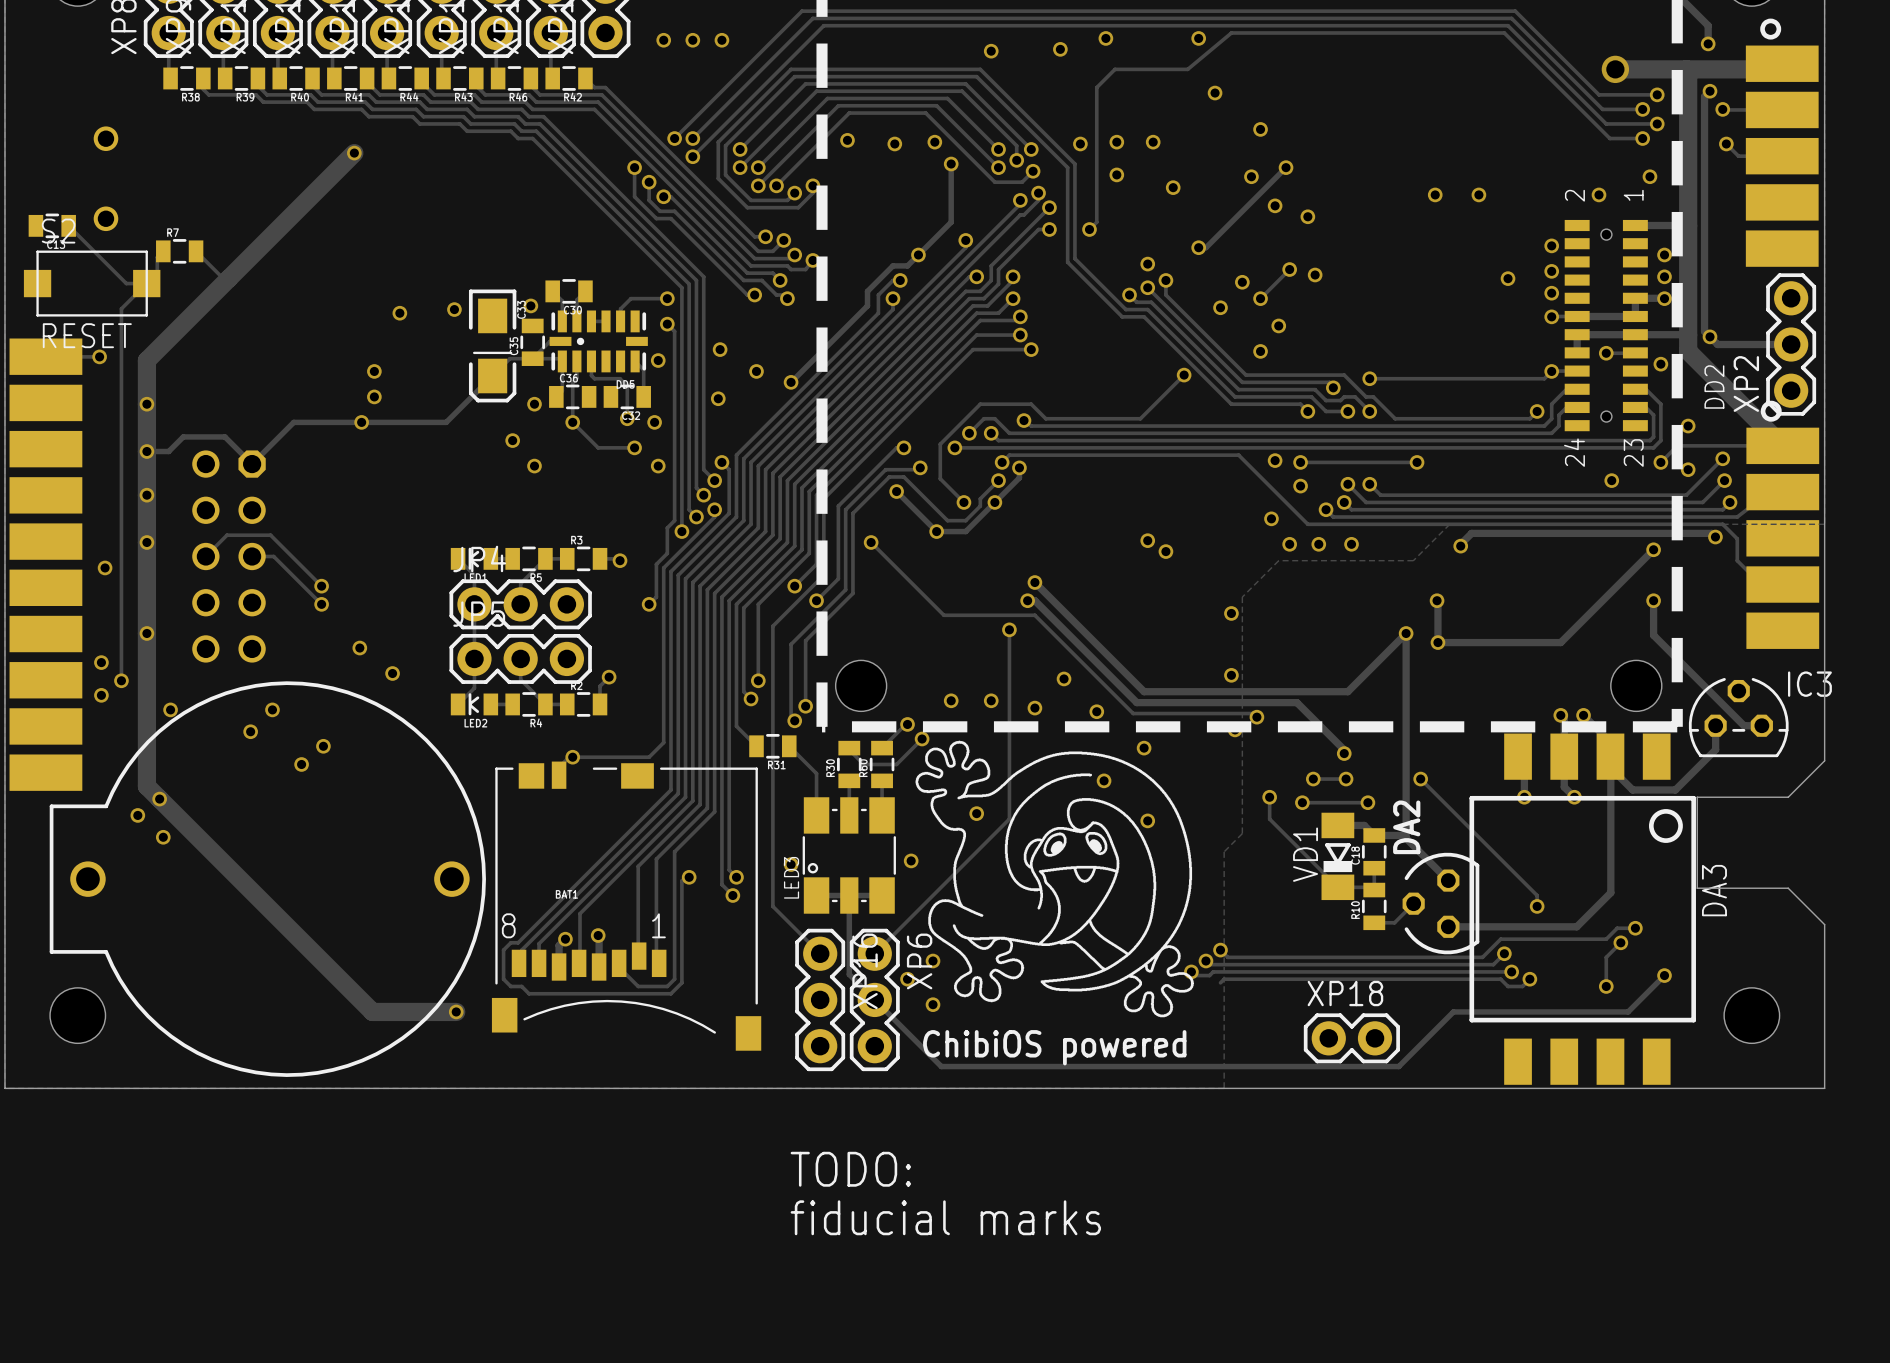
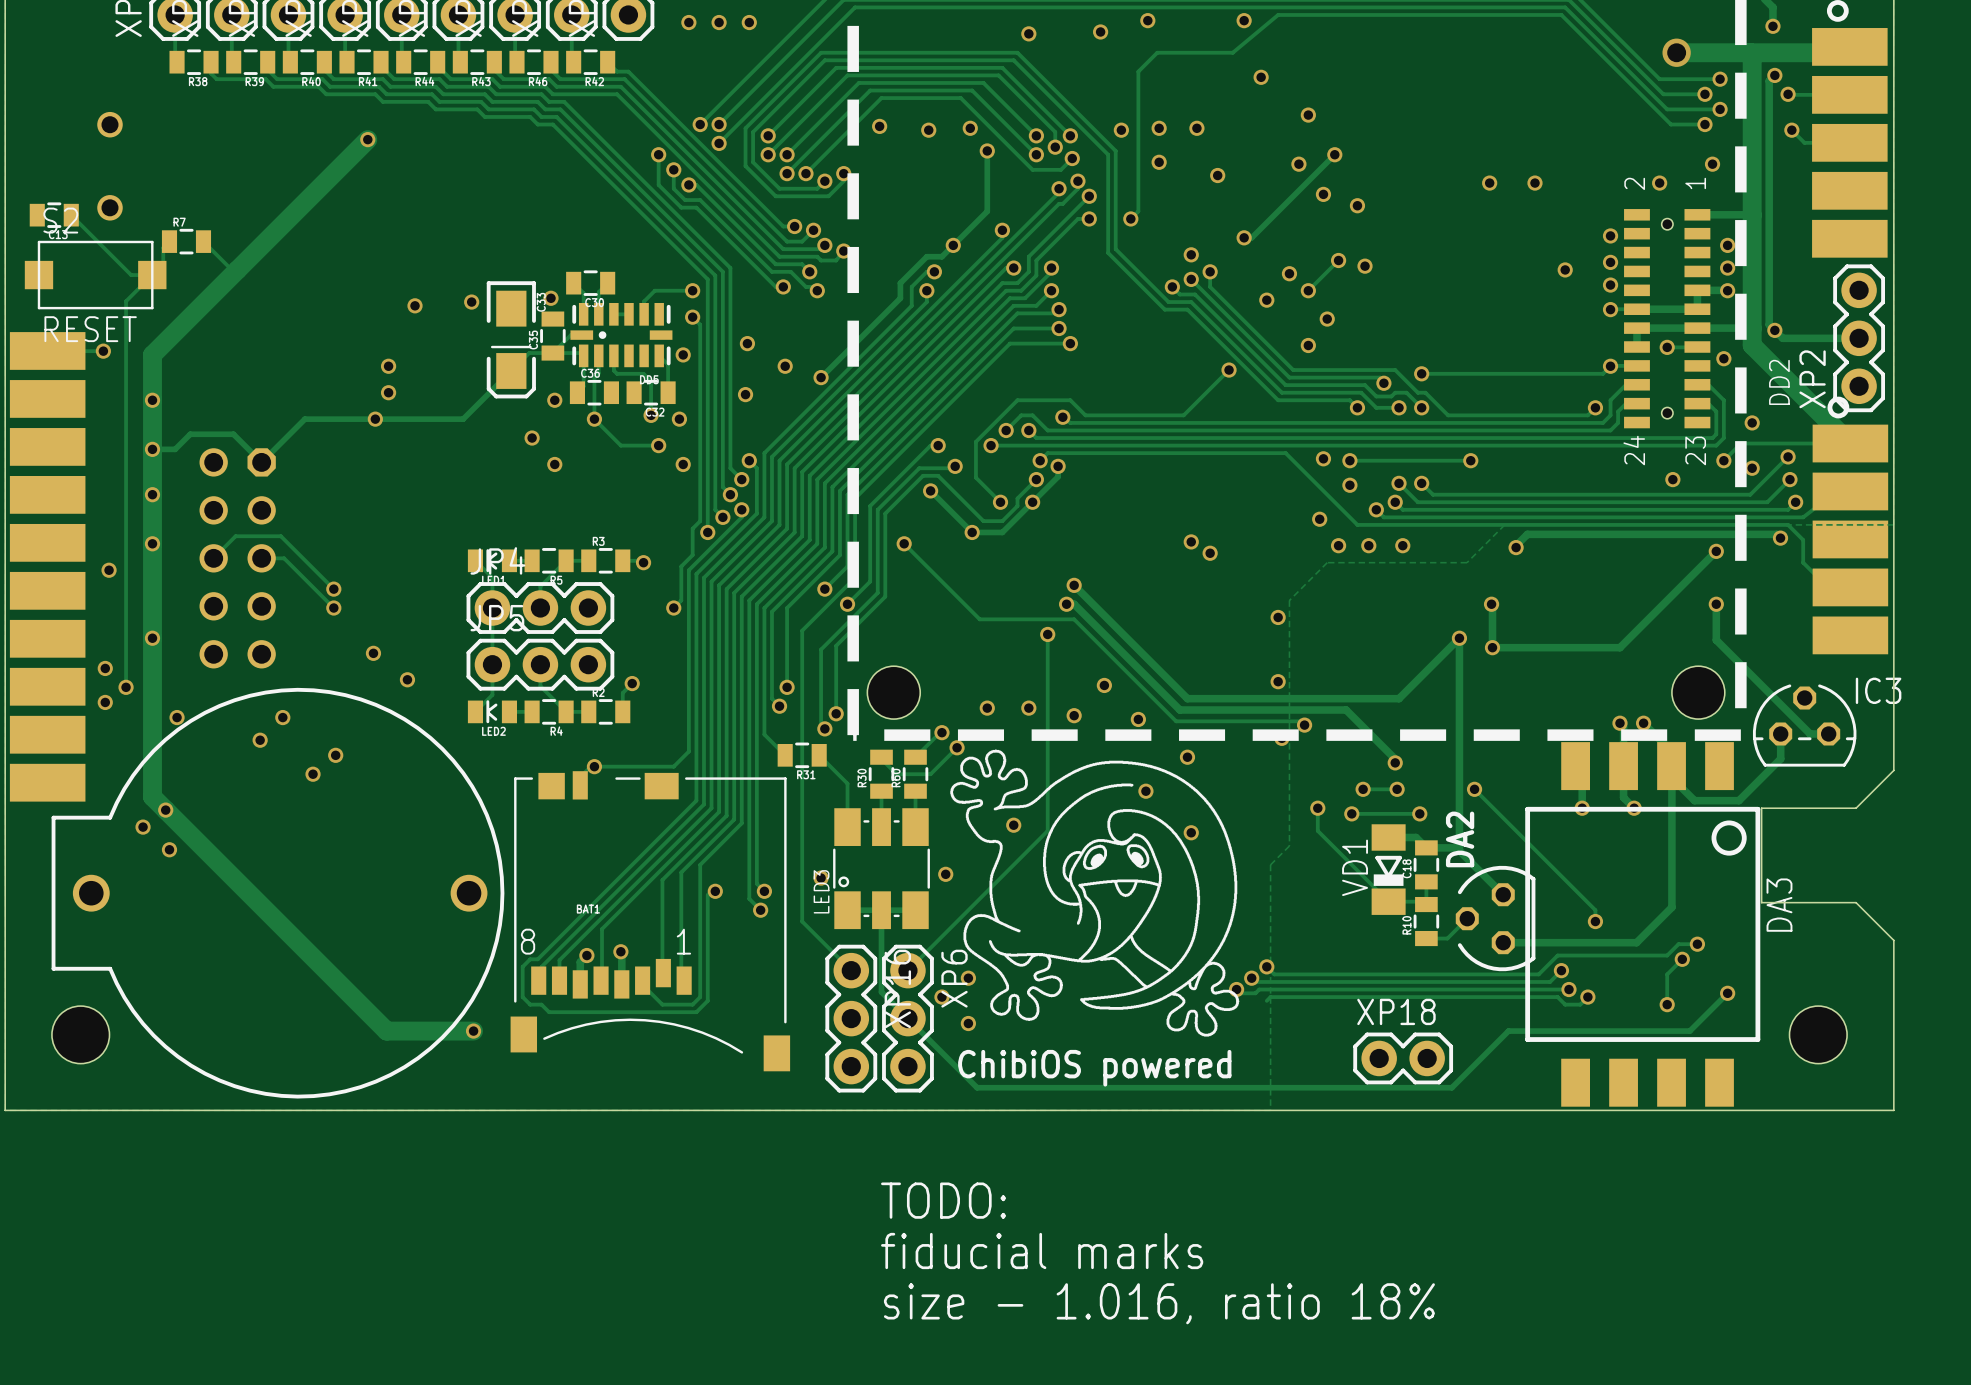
text position: TODO: (850, 1169) -> TODO: (943, 1200)
text position: fiducial marks (945, 1217) -> fiducial marks (1042, 1250)
text: none -> size - 1.016, ratio 18% (1159, 1303)

